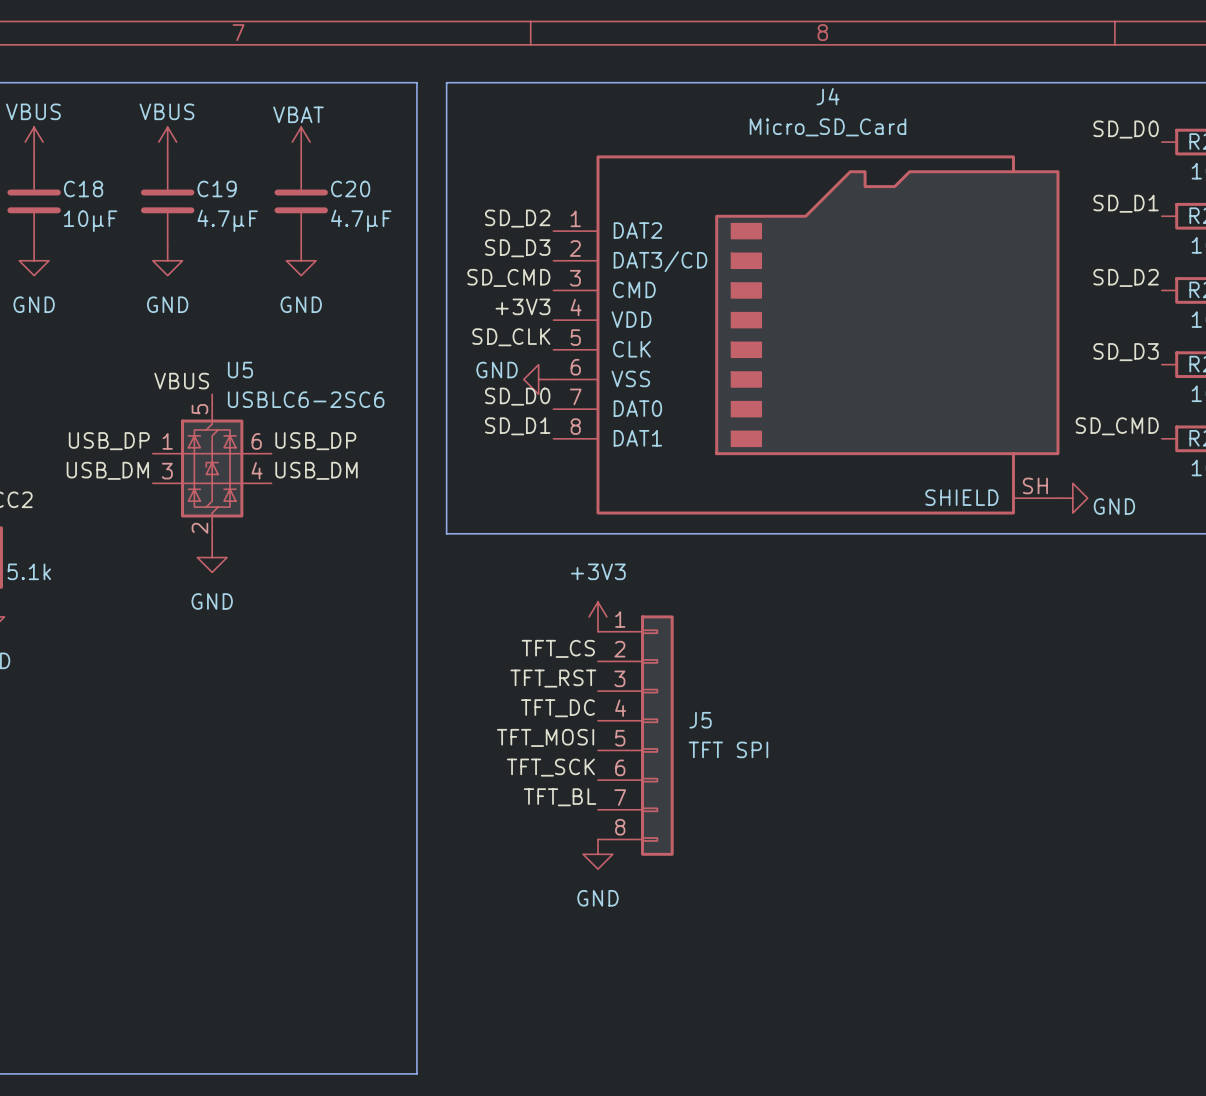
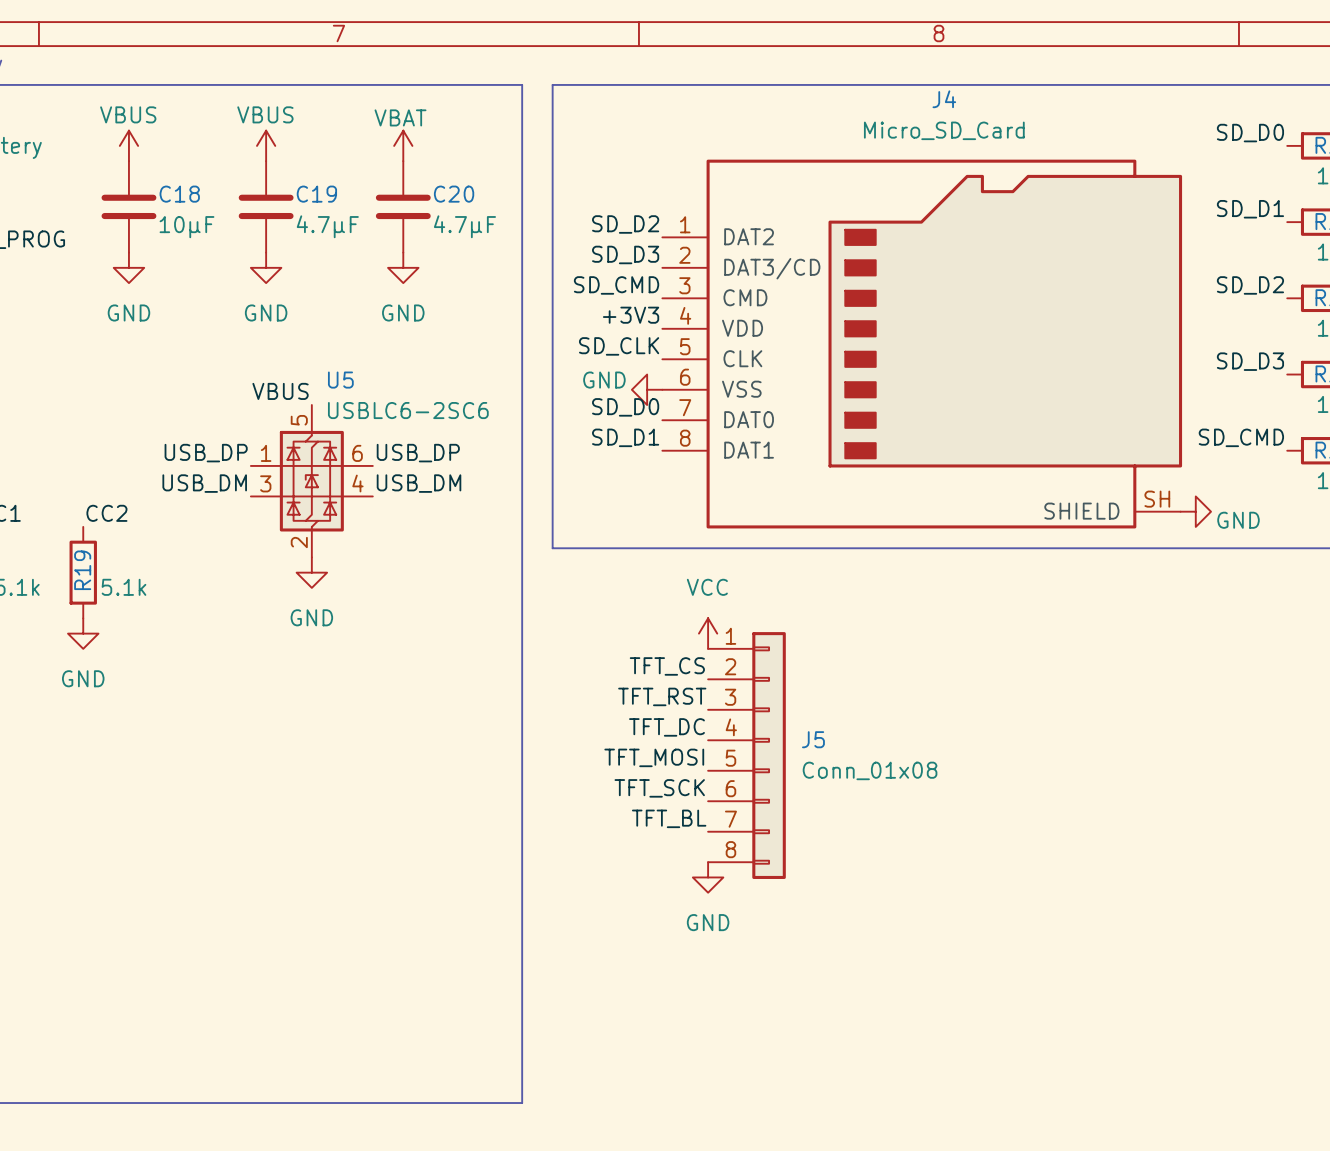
power symbol: +3V3 (597, 616) -> VCC (708, 633)
J5 value: TFT SPI (728, 749) -> Conn_01x08 (870, 770)

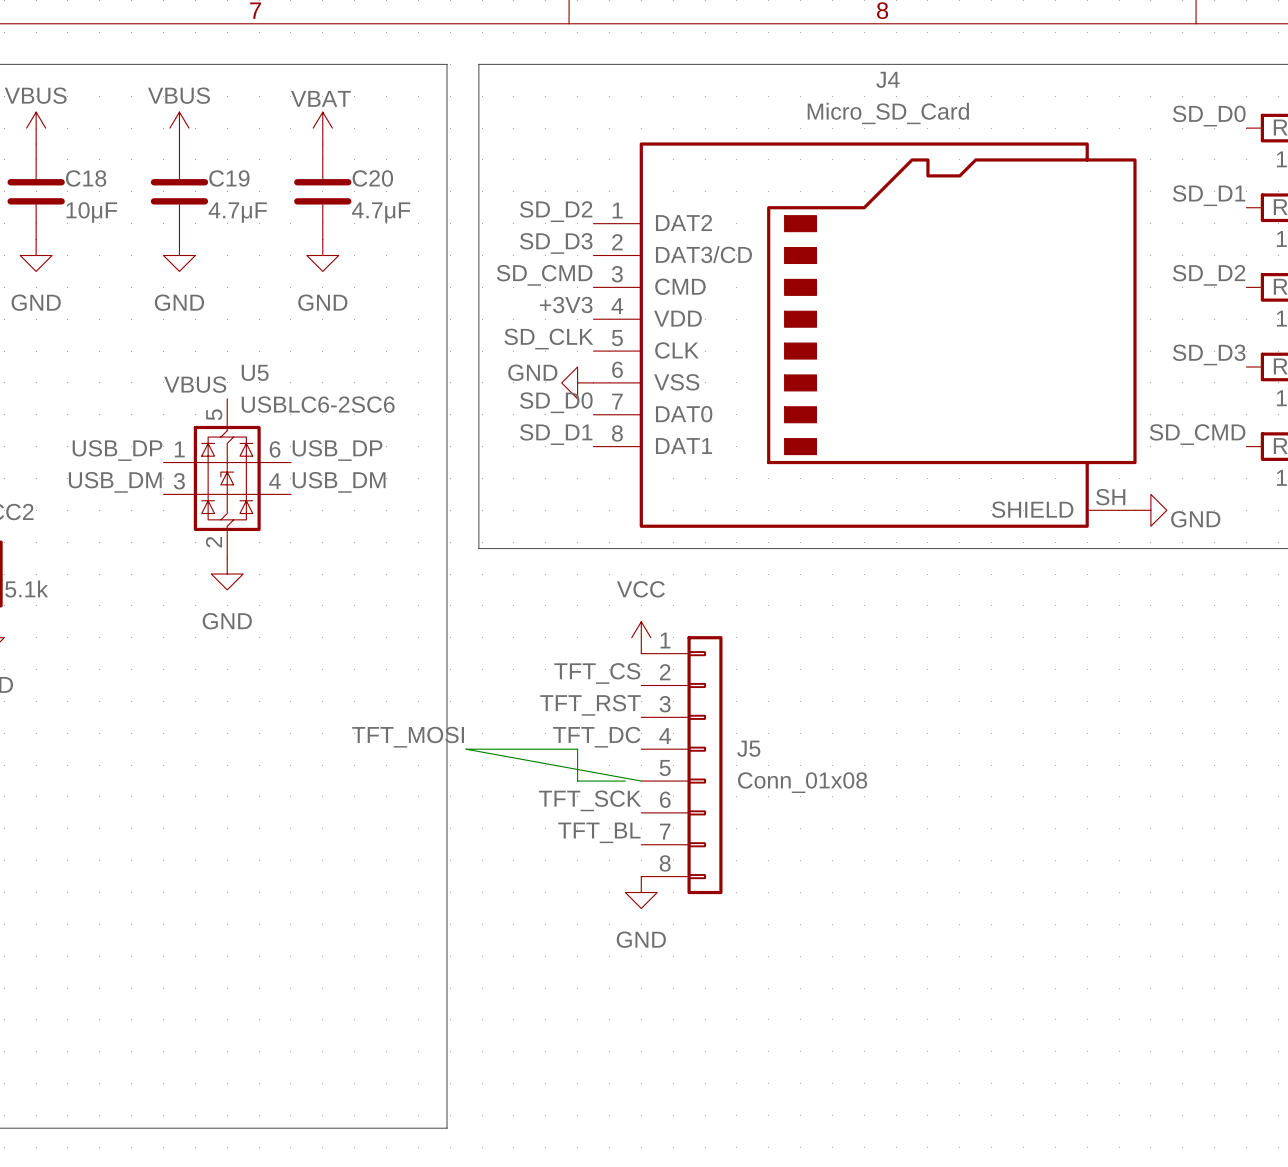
label position: TFT_MOSI (654, 757) -> TFT_MOSI (408, 737)
wire: none -> (625, 781) (577, 781) (577, 749) (466, 749) (641, 781)

